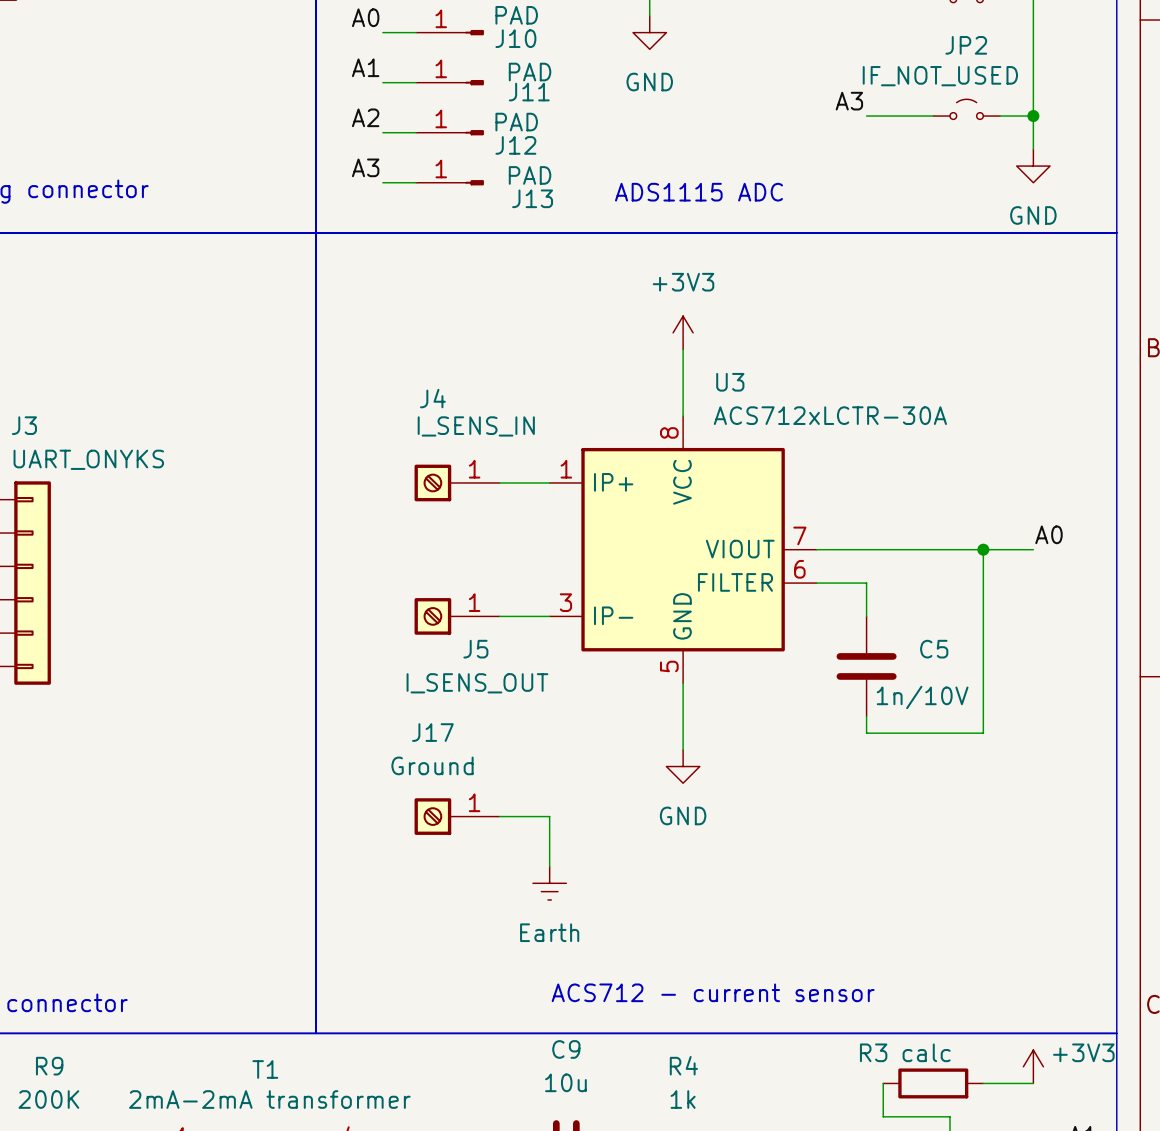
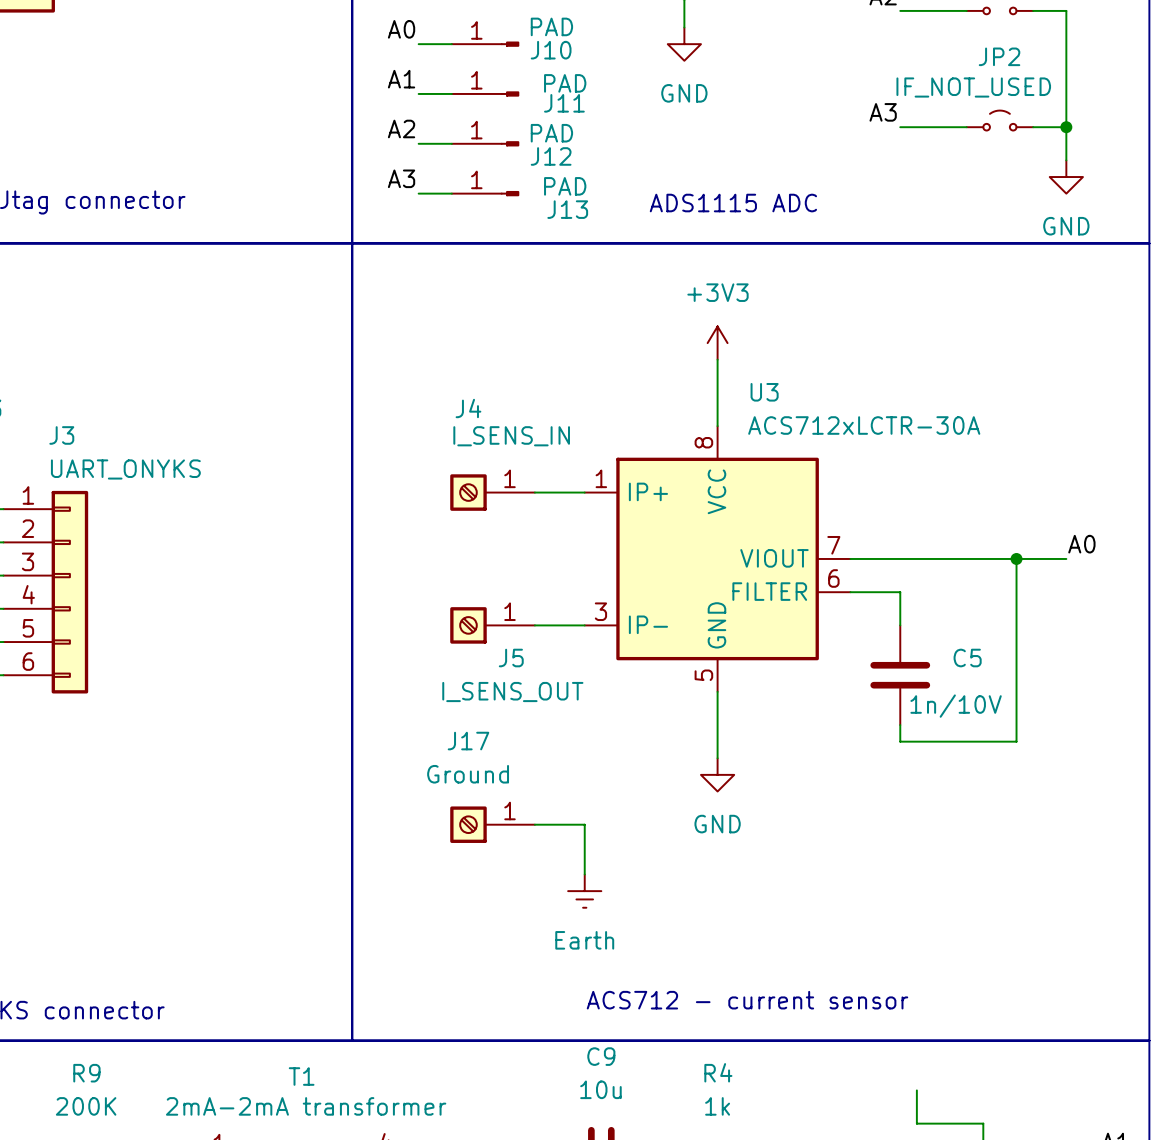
power symbol: +3V3 (1033, 1066) -> none
R3: calc (933, 1083) -> none
wire: (983, 1083) (1033, 1083) -> none

